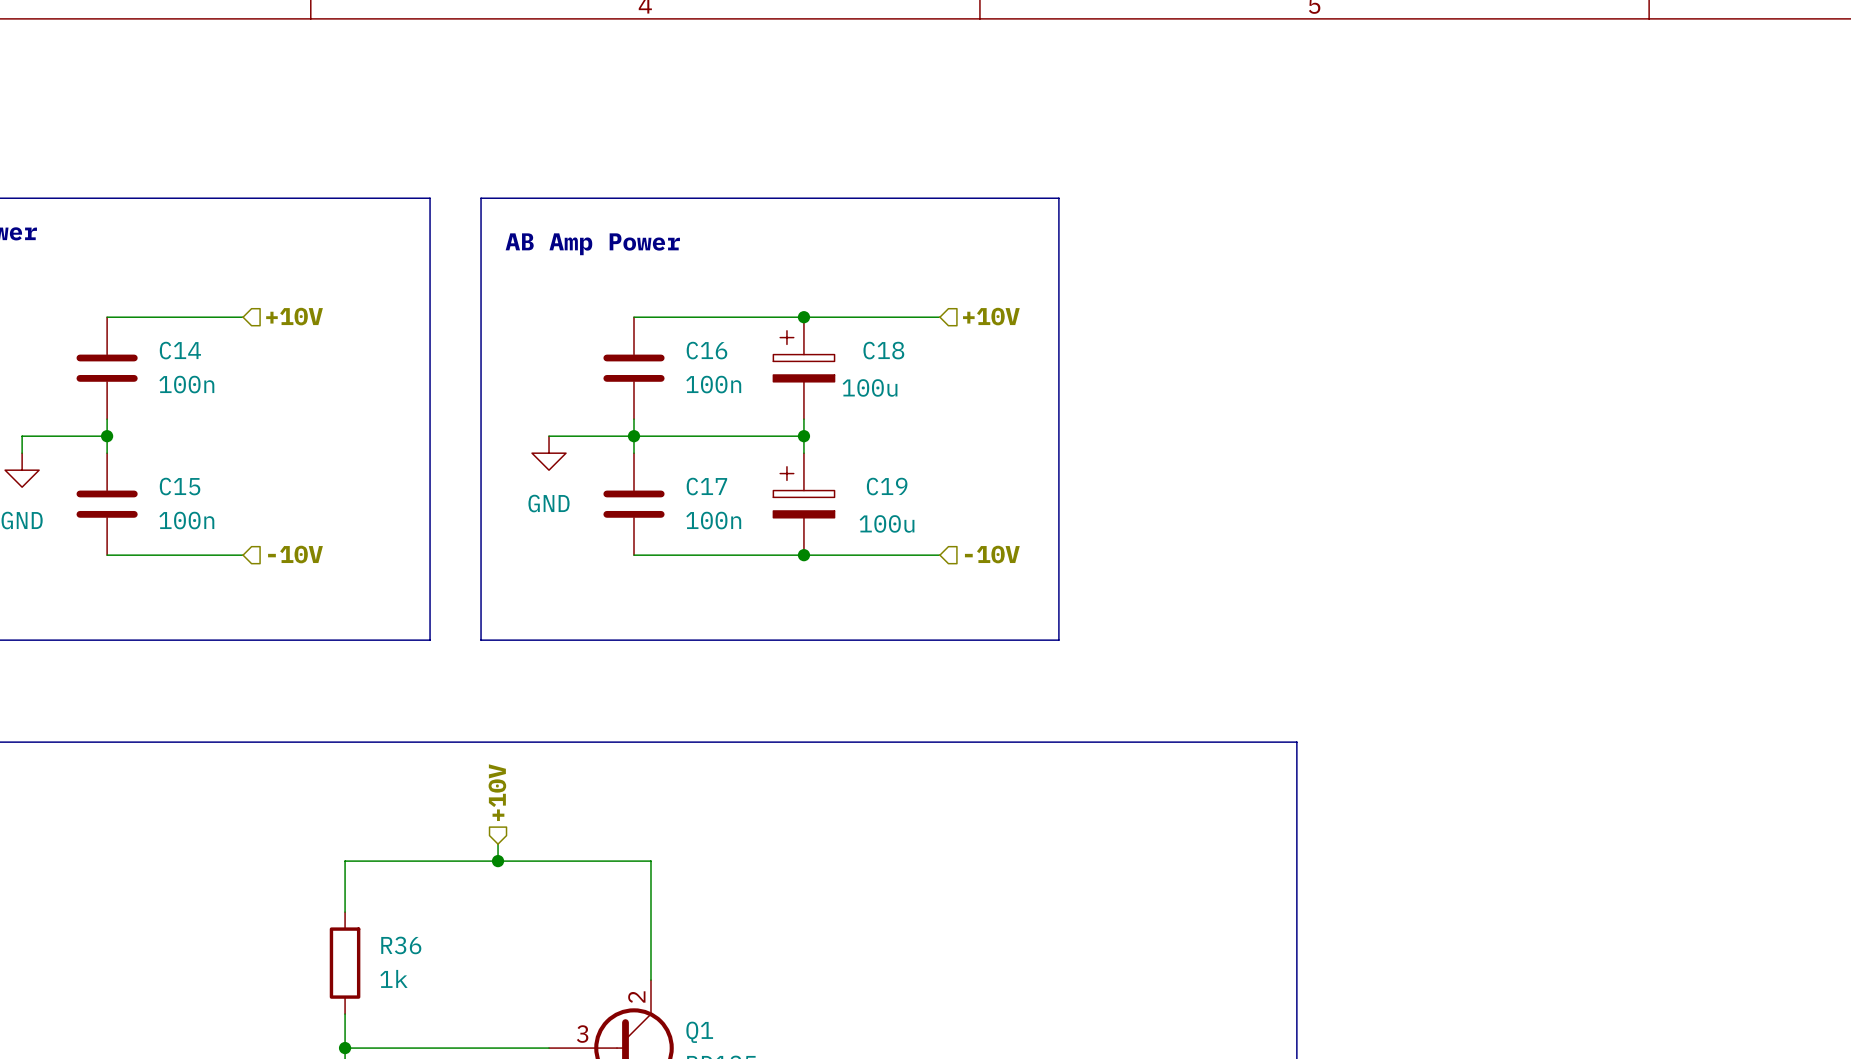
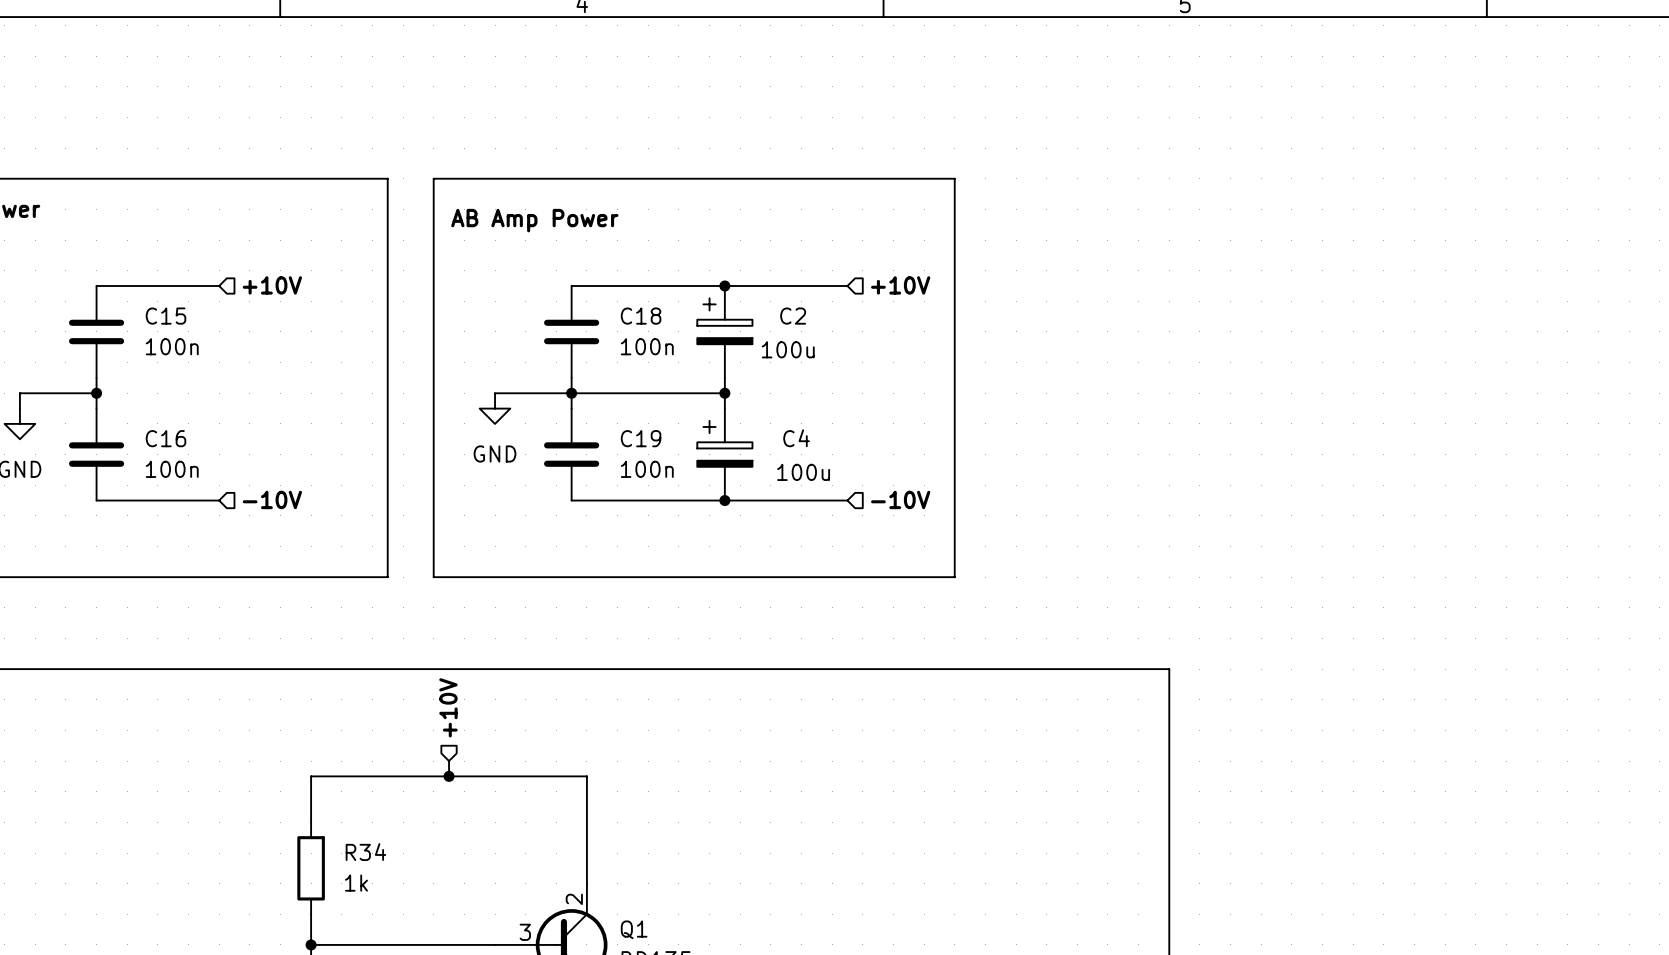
C14 name: C14 (180, 350) -> C15 (166, 316)
C16 name: C16 (706, 350) -> C18 (641, 316)
C18 name: C18 (883, 350) -> C2 (793, 316)
C15 name: C15 (180, 486) -> C16 (166, 438)
C17 name: C17 (706, 486) -> C19 (641, 438)
C19 name: C19 (887, 486) -> C4 (796, 438)
R36 name: R36 (401, 945) -> R34 (365, 852)

